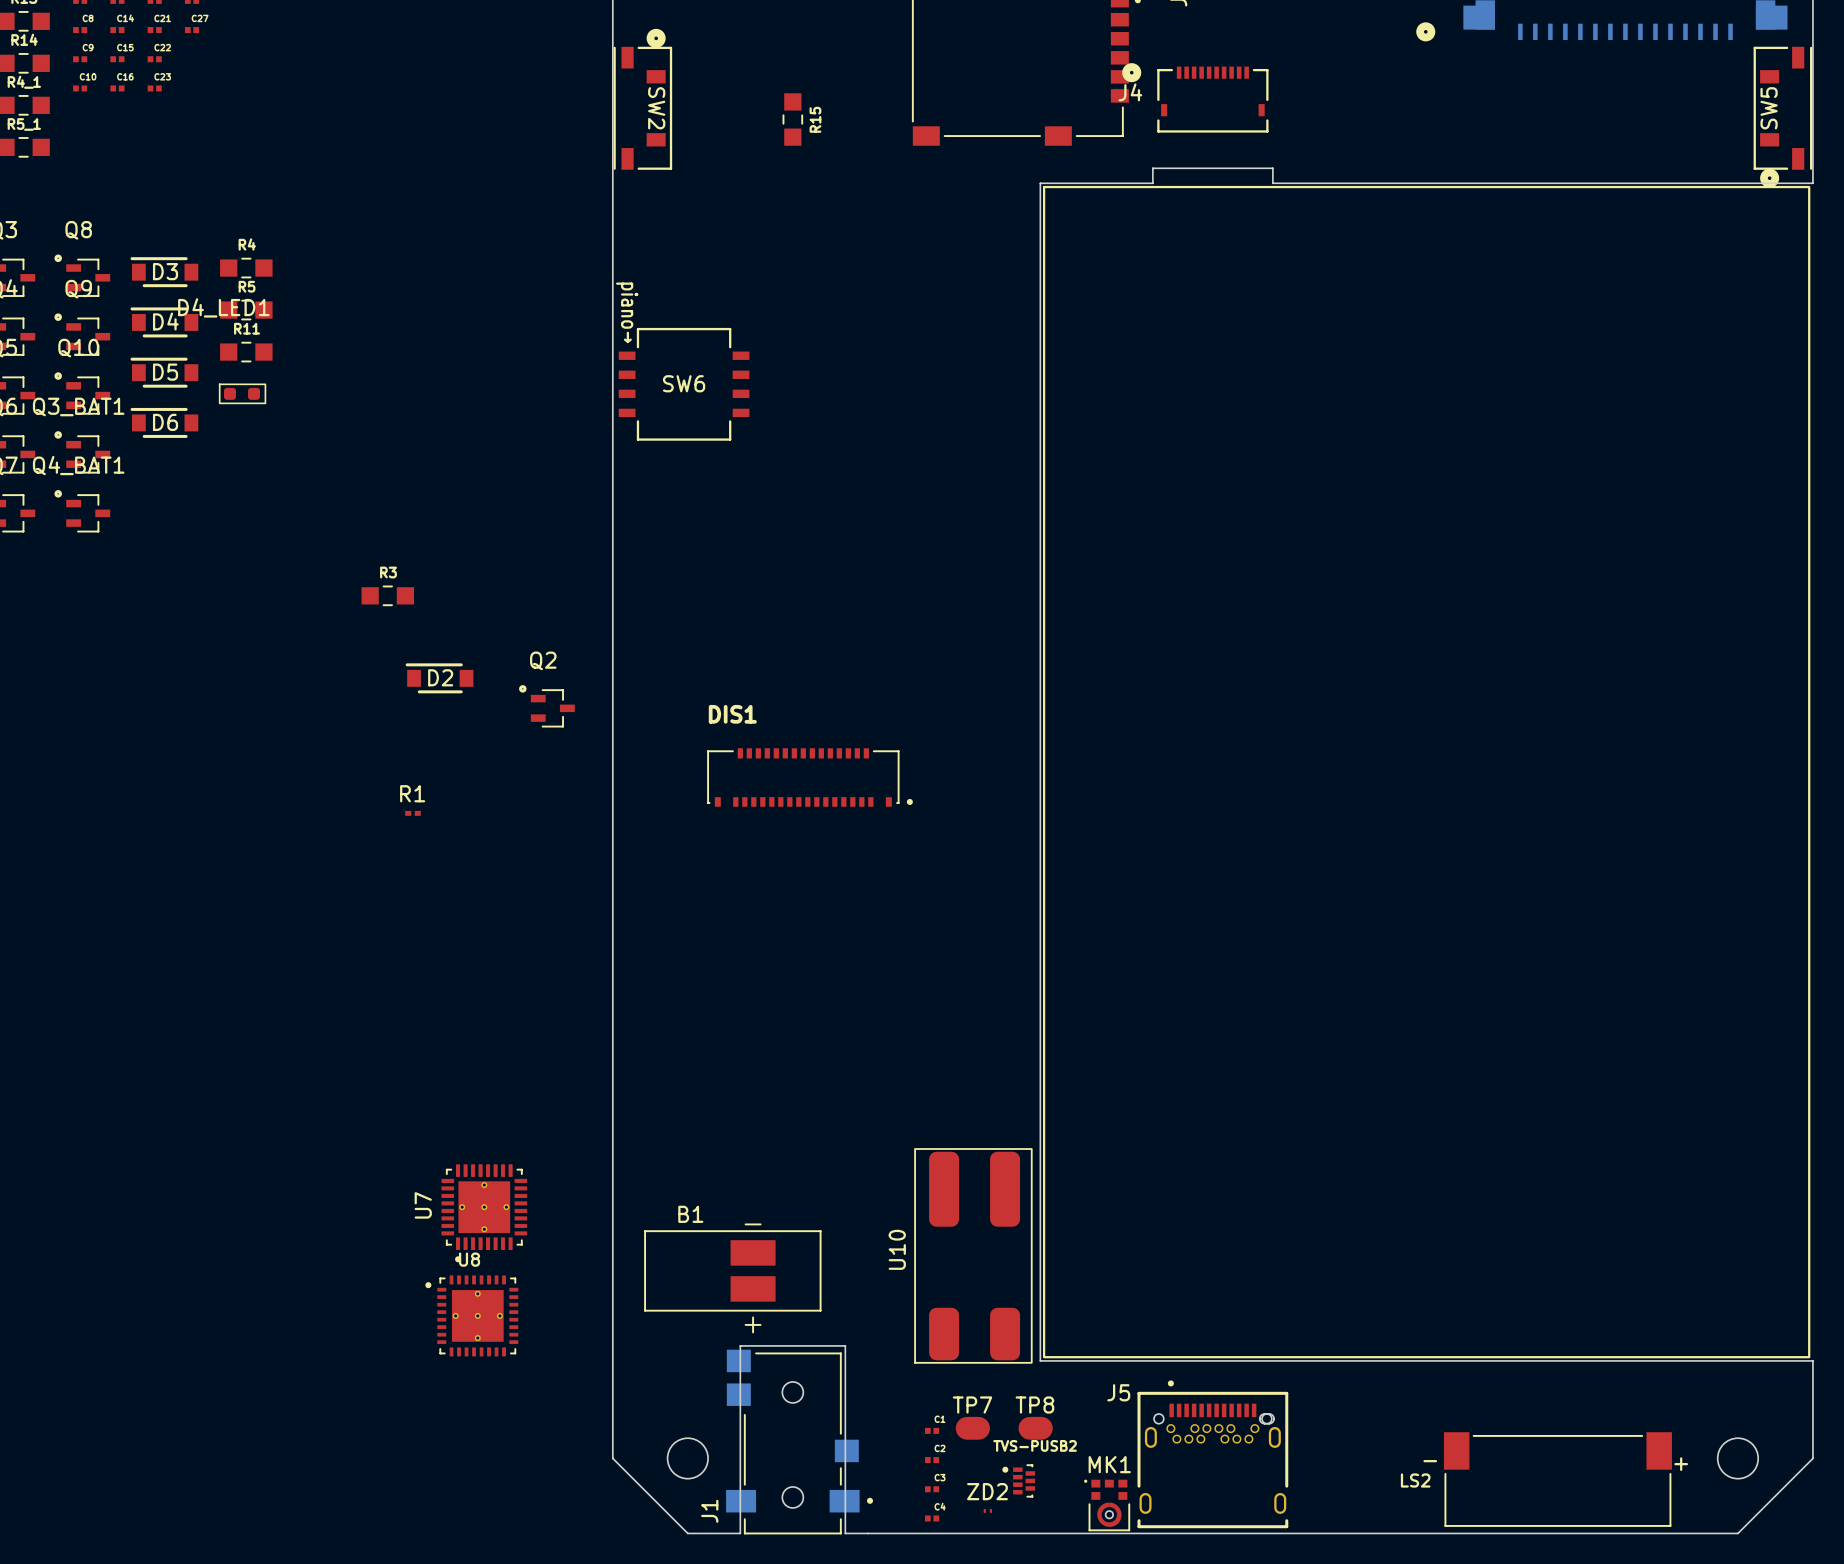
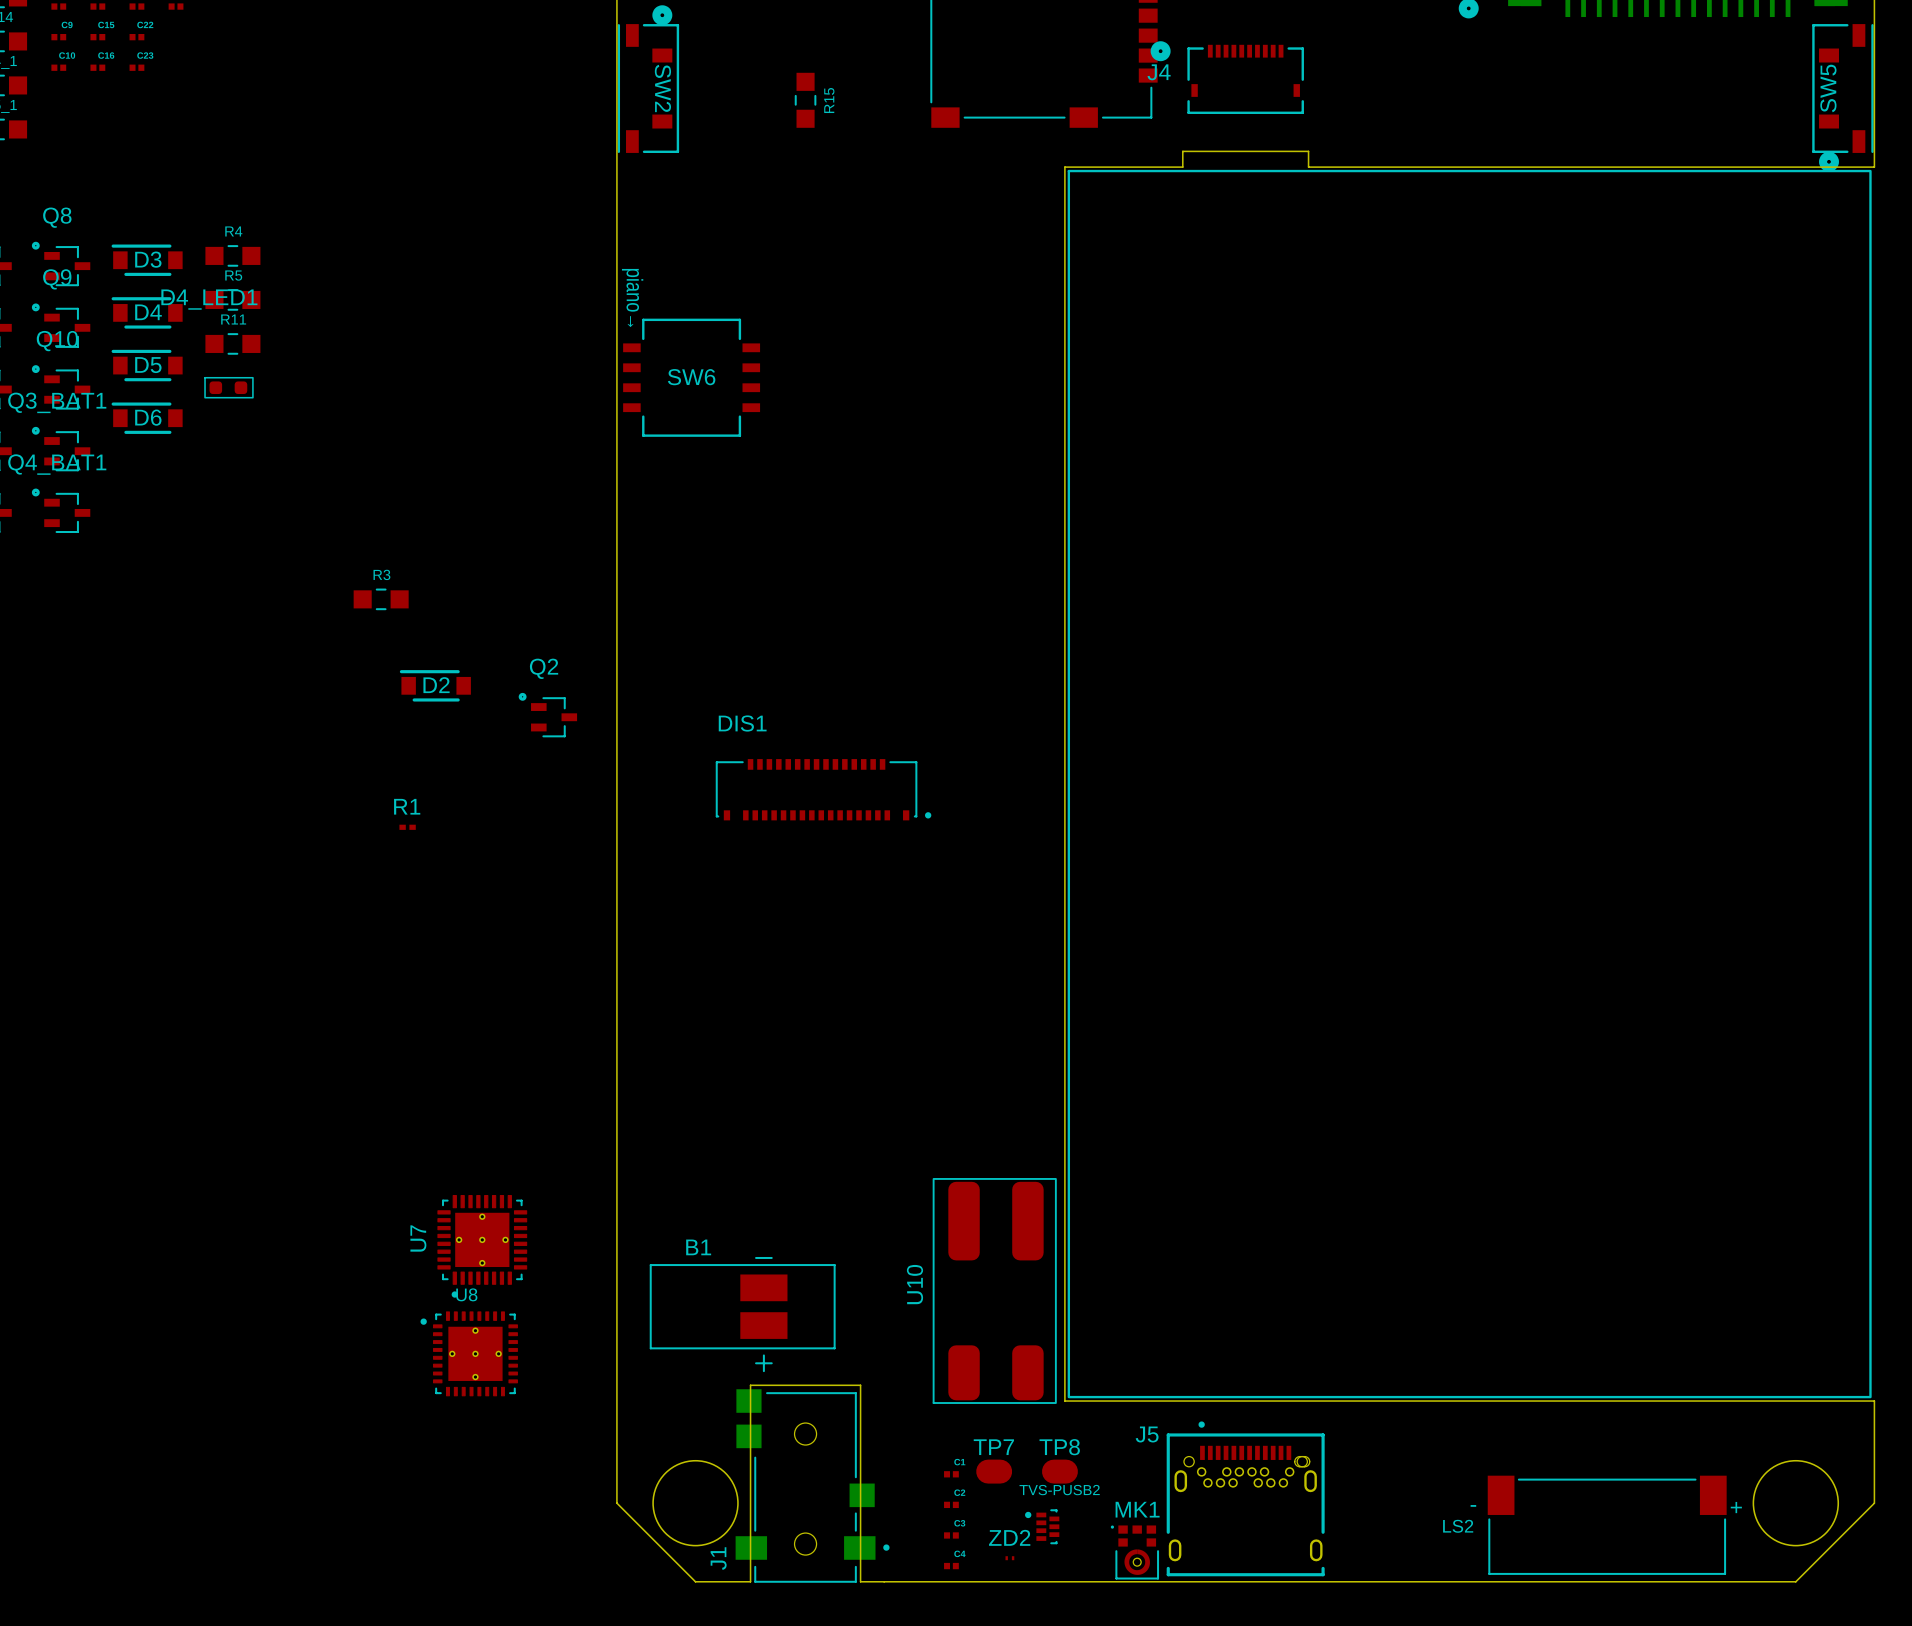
round board edge size: [666, 1437, 709, 1480] -> [652, 1459, 739, 1547]
round board edge size: [1716, 1437, 1759, 1480] -> [1752, 1459, 1840, 1547]

